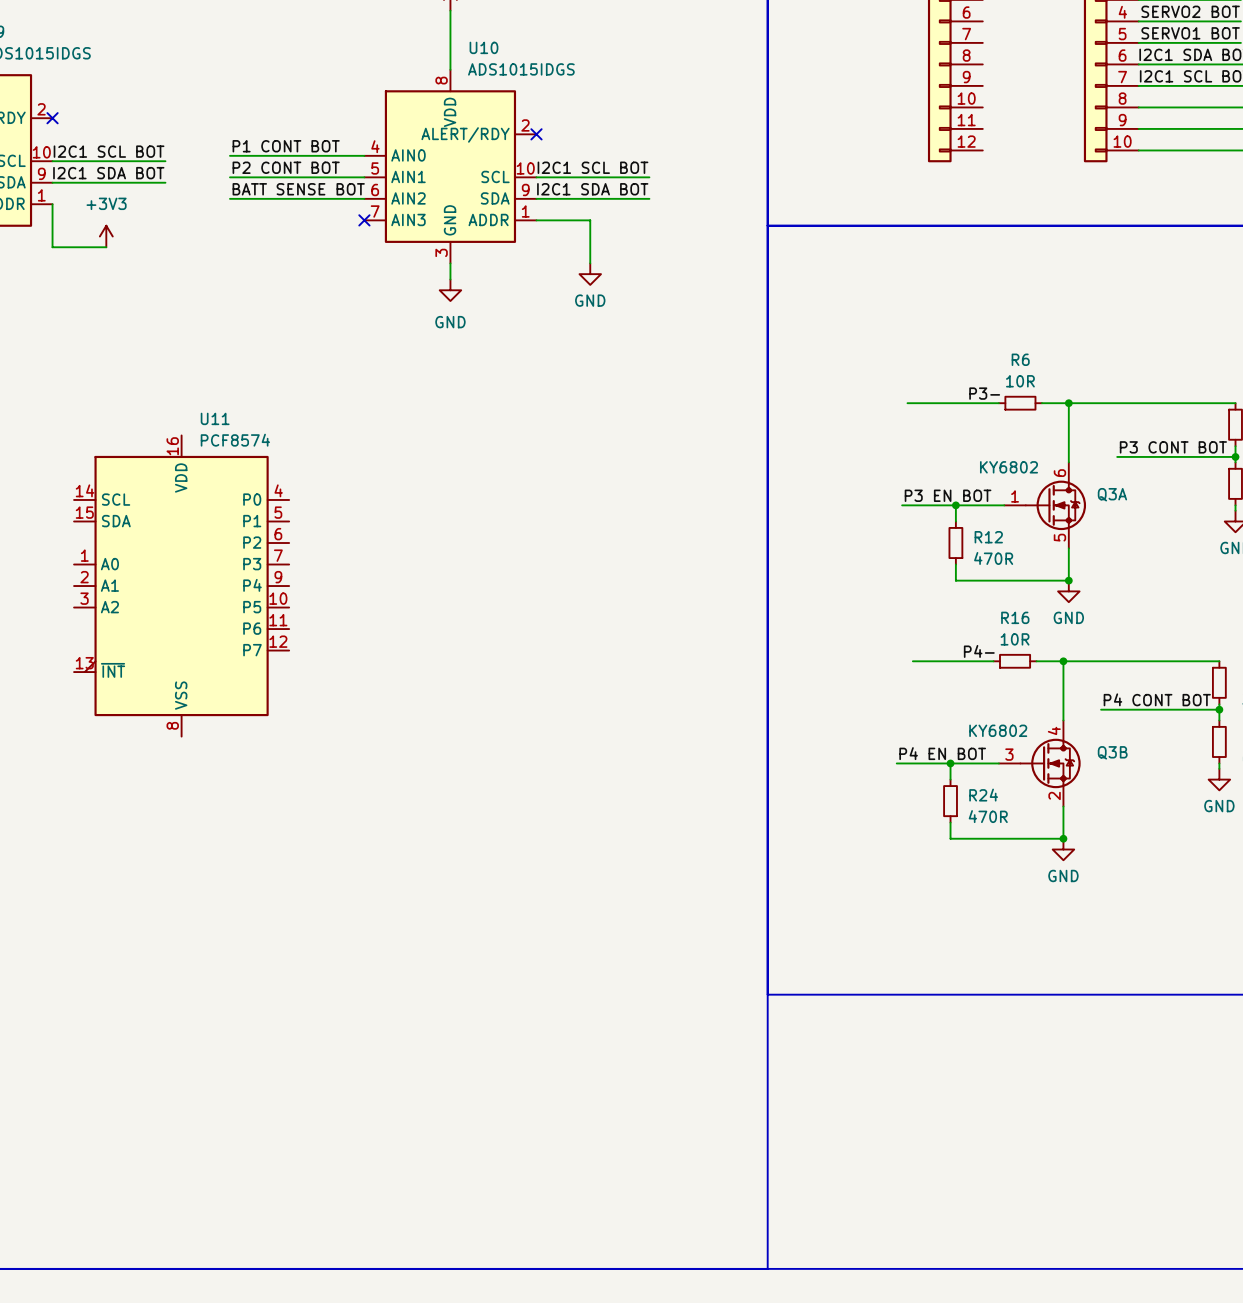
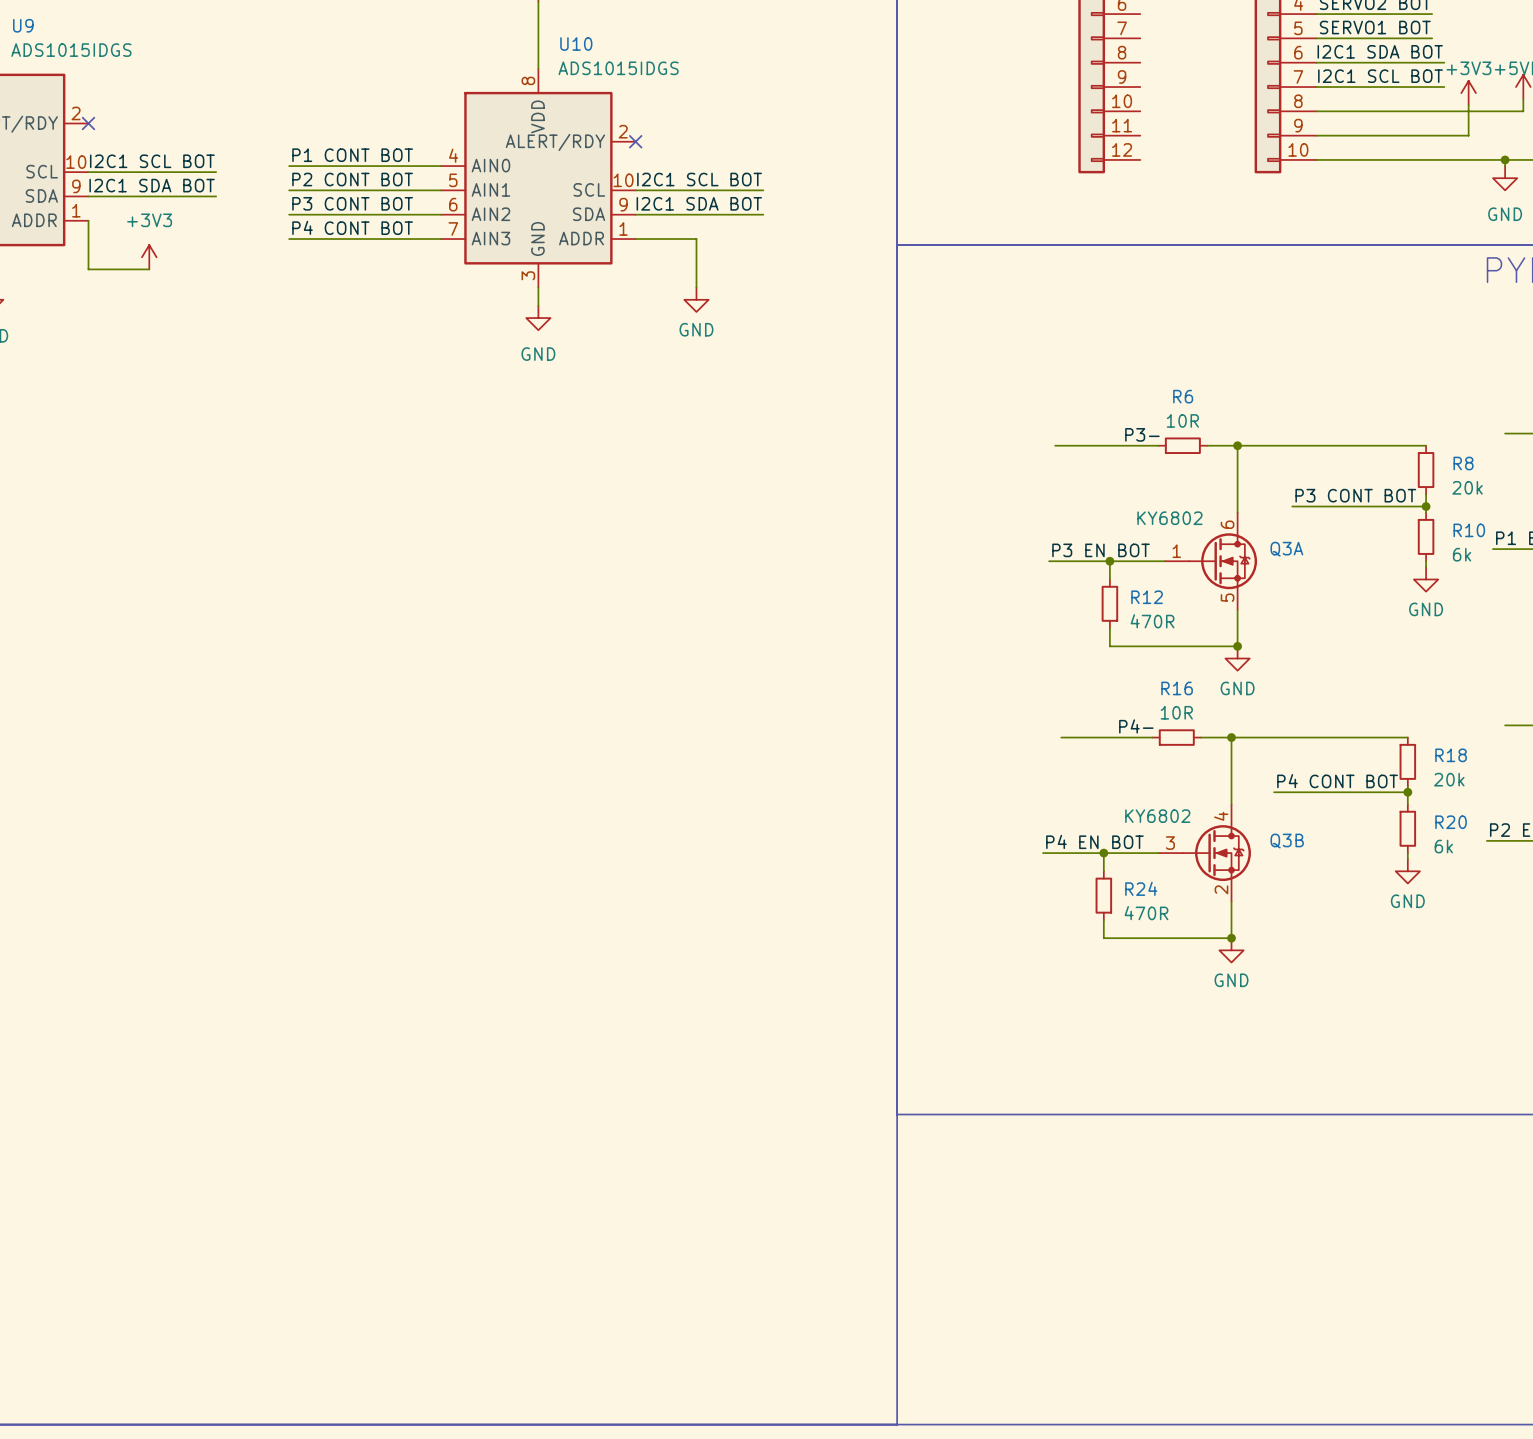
label: BATT SENSE BOT (298, 189) -> P3 CONT BOT (352, 203)
label: none -> P4 CONT BOT (352, 227)
wire: none -> (289, 239) (441, 239)
no-connect mark: (364, 220) -> none
U11: PCF8574 (181, 586) -> none

